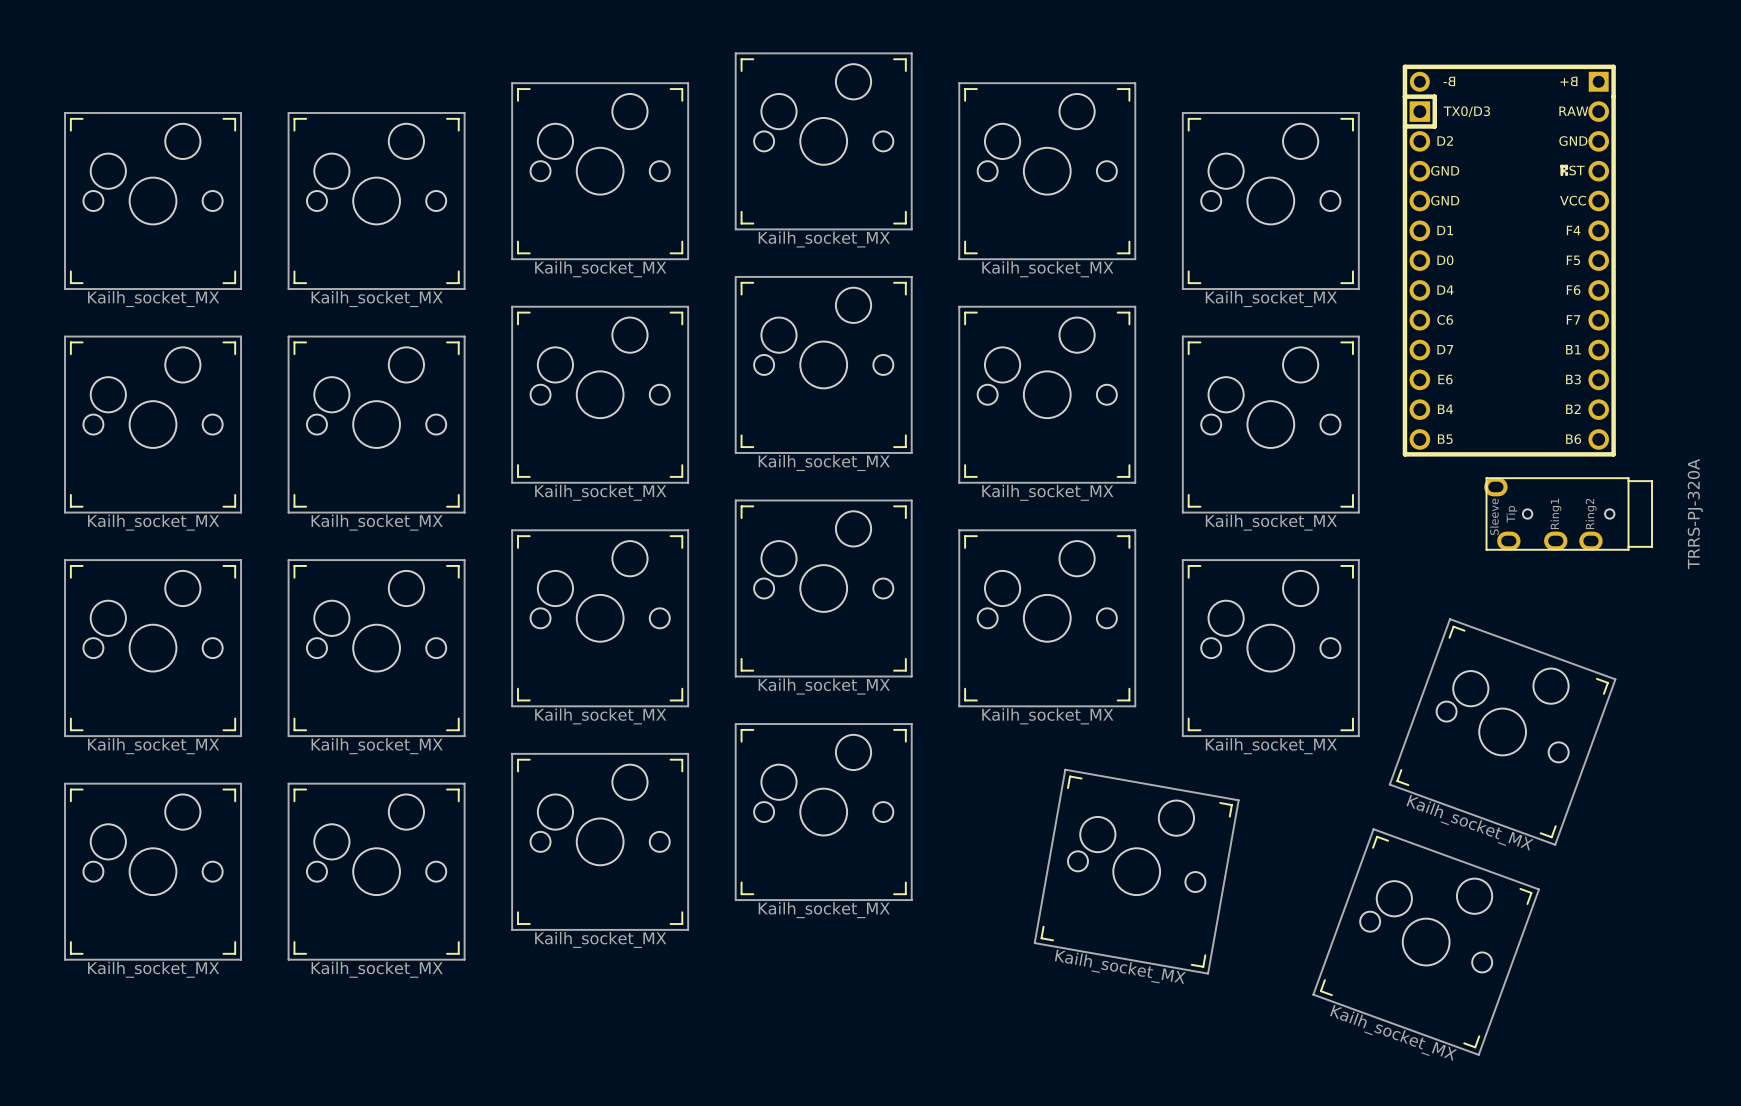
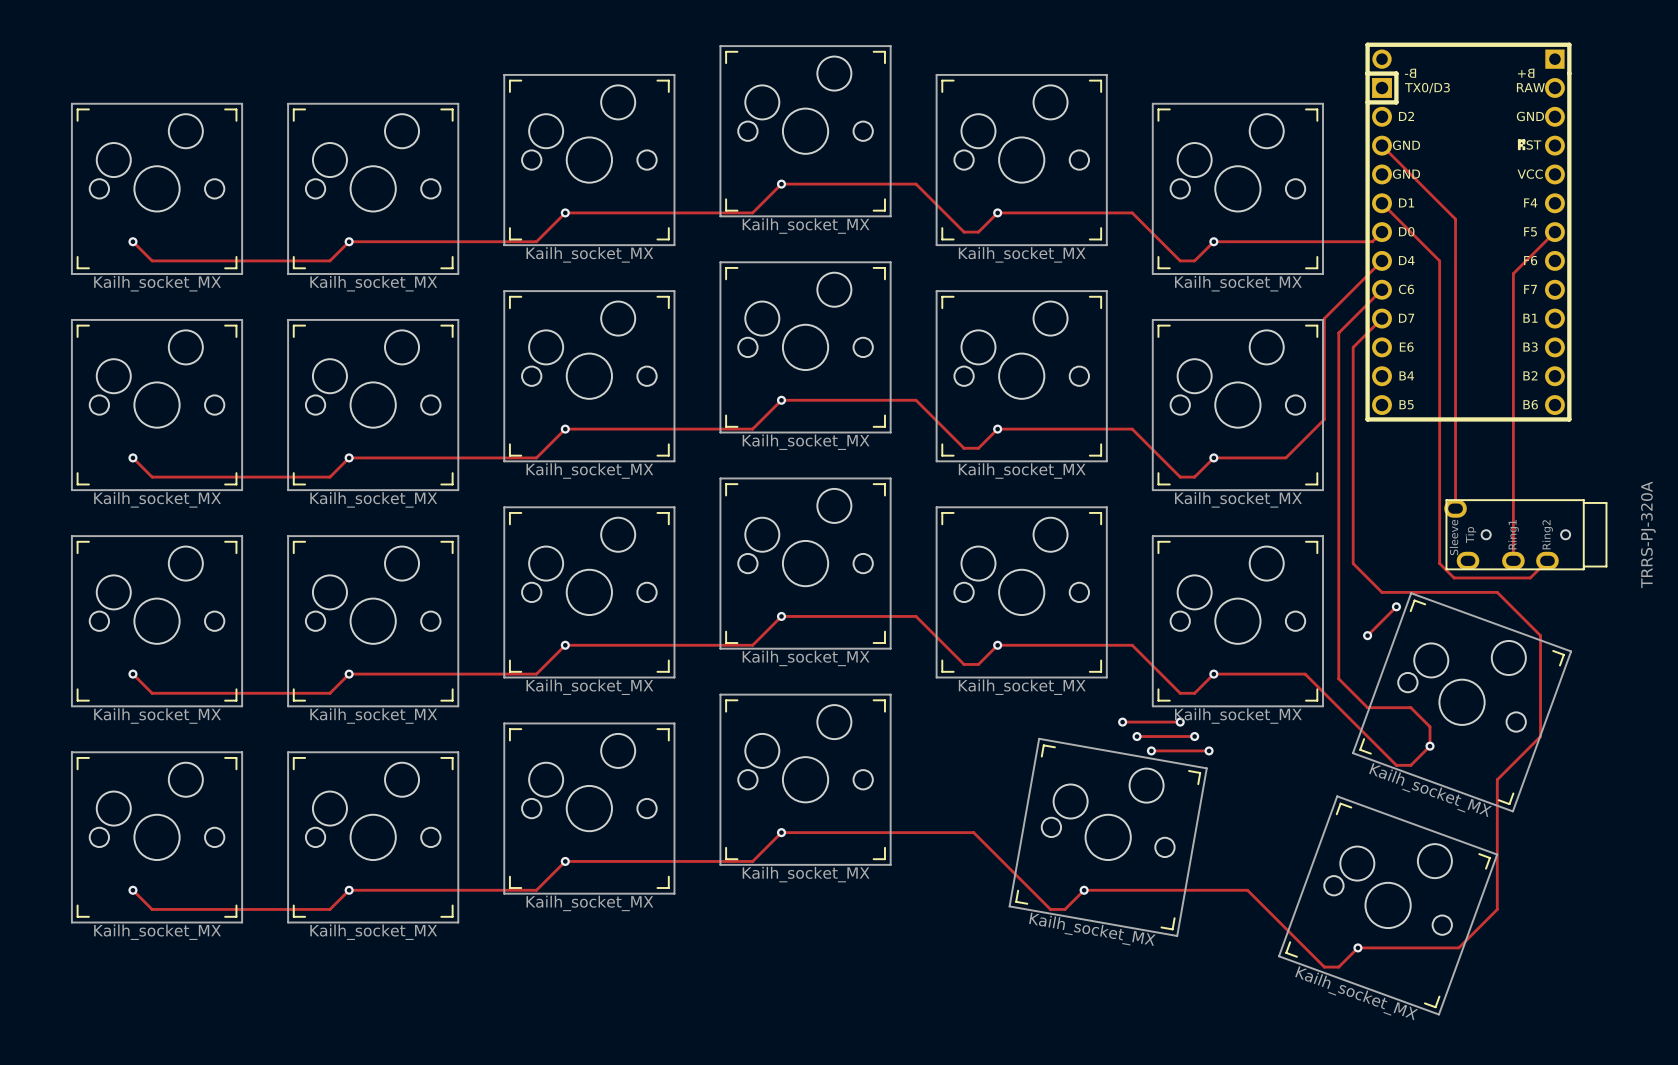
part position: (1419, 81) -> (1382, 59)
part position: (1598, 81) -> (1554, 59)
track: none -> (1382, 145) (1455, 219) (1455, 508)
via: none -> (781, 184)
track: none -> (1382, 203) (1439, 260) (1439, 563) (1454, 577) (1530, 577) (1547, 560)
via: none -> (565, 212)
via: none -> (997, 212)
track: none -> (1382, 232) (1372, 241) (1213, 241) (1194, 260) (1180, 260) (1132, 212) (997, 212) (978, 232) (964, 232) (916, 184) (781, 184) (752, 212) (565, 212) (536, 241) (349, 241) (329, 260) (152, 260) (132, 241)
track: none -> (1554, 232) (1513, 273) (1513, 560)
via: none -> (132, 241)
via: none -> (349, 241)
via: none -> (1213, 241)
part position: (1509, 260) -> (1468, 232)
track: none -> (1382, 260) (1324, 318) (1324, 419) (1285, 457) (1213, 457) (1194, 477) (1180, 477) (1132, 429) (997, 429) (978, 448) (964, 448) (916, 400) (781, 400) (752, 429) (565, 429) (536, 457) (349, 457) (329, 477) (152, 477) (132, 457)
track: none -> (1382, 289) (1338, 332) (1338, 678) (1367, 707) (1410, 707) (1430, 726) (1430, 746) (1410, 765) (1396, 765) (1305, 674) (1213, 674) (1194, 693) (1180, 693) (1132, 645) (997, 645) (978, 664) (964, 664) (916, 616) (781, 616) (752, 645) (565, 645) (536, 674) (349, 674) (329, 693) (152, 693) (132, 674)
track: none -> (1382, 318) (1353, 347) (1353, 563) (1382, 592) (1497, 592) (1540, 635) (1540, 736) (1497, 779) (1497, 909) (1458, 947) (1357, 947) (1338, 967) (1324, 967) (1247, 890) (1084, 890) (1064, 909) (1050, 909) (973, 832) (781, 832) (752, 861) (565, 861) (536, 890) (349, 890) (329, 909) (152, 909) (132, 890)
via: none -> (781, 400)
via: none -> (565, 429)
via: none -> (997, 429)
via: none -> (132, 457)
via: none -> (349, 457)
via: none -> (1213, 457)
part position: (1568, 513) -> (1525, 534)
track: none -> (1396, 606) (1367, 635)
via: none -> (1396, 606)
via: none -> (781, 616)
via: none -> (1367, 635)
via: none -> (565, 645)
via: none -> (997, 645)
via: none -> (132, 674)
via: none -> (349, 674)
via: none -> (1213, 674)
track: none -> (1122, 722) (1180, 722)
via: none -> (1122, 722)
via: none -> (1180, 722)
track: none -> (1137, 736) (1194, 736)
via: none -> (1137, 736)
via: none -> (1194, 736)
via: none -> (1430, 746)
track: none -> (1151, 750) (1209, 750)
via: none -> (1151, 750)
via: none -> (1209, 750)
via: none -> (781, 832)
via: none -> (565, 861)
via: none -> (132, 890)
via: none -> (349, 890)
via: none -> (1084, 890)
via: none -> (1357, 947)

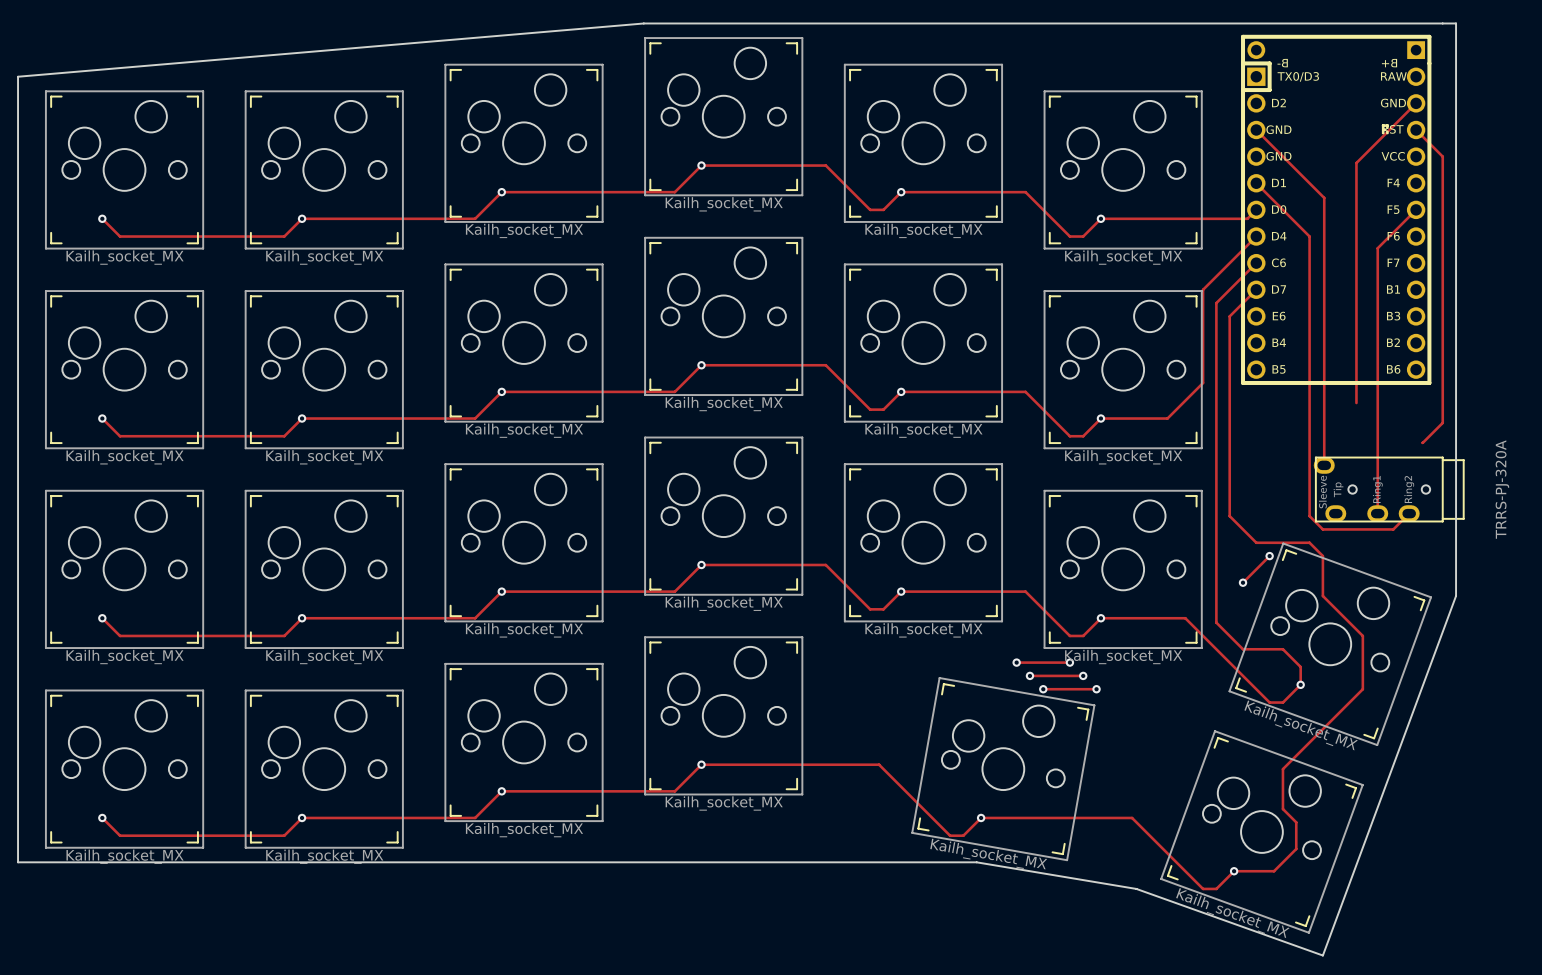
board edge: none -> (643, 23) (1456, 23) (1456, 596) (1322, 955) (1136, 888) (976, 862) (18, 862) (18, 76) (643, 23)
track: none -> (1416, 103) (1356, 163) (1356, 403)
track: none -> (1416, 130) (1442, 156) (1442, 422) (1422, 442)
track: (1439, 592) (1497, 592) (1540, 635) (1540, 736) (1497, 779) (1497, 909) (1458, 947) (1401, 947) -> (1309, 542) (1322, 556) (1322, 596) (1362, 635) (1362, 689) (1282, 769) (1282, 809) (1296, 822) (1296, 849) (1274, 871)

